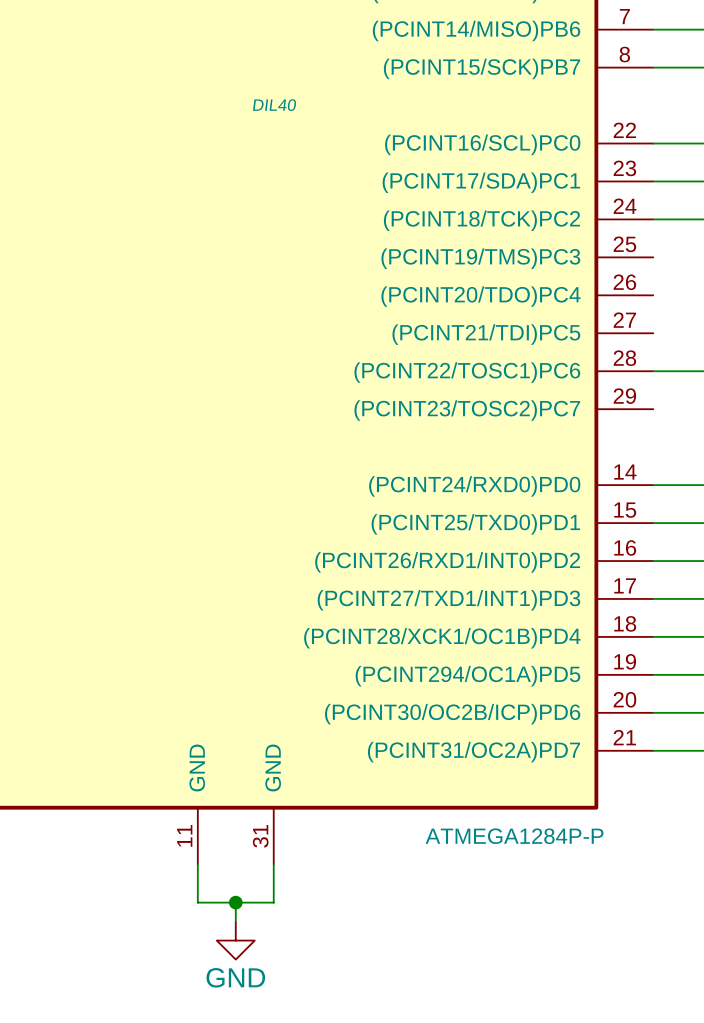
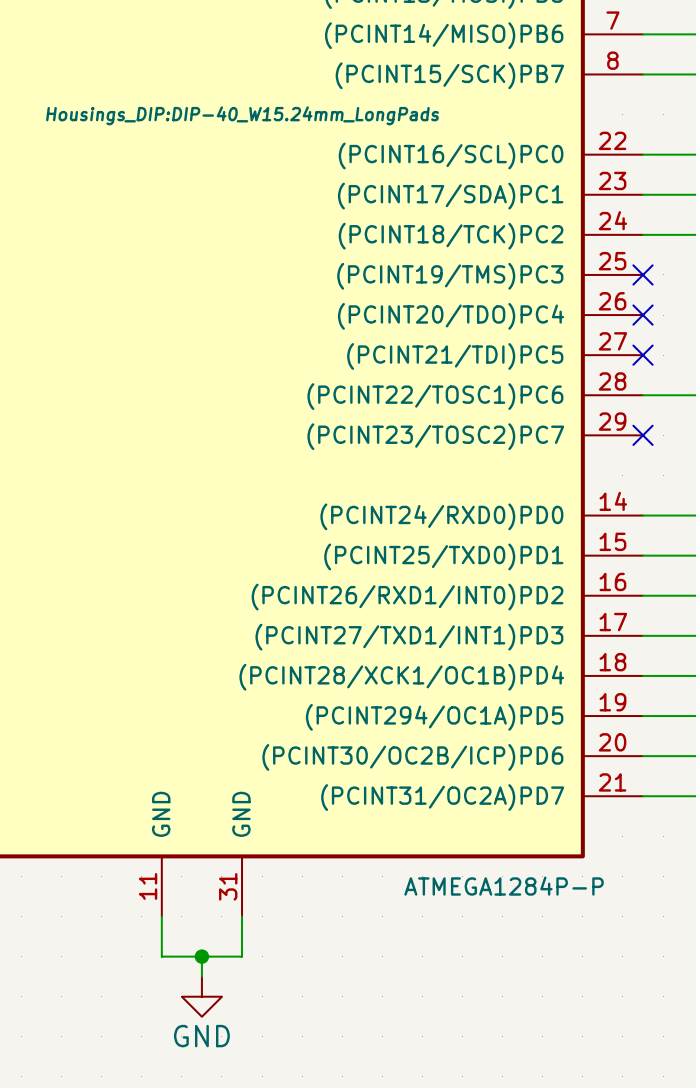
part text: DIL40 (274, 105) -> Housings_DIP:DIP-40_W15.24mm_LongPads (242, 115)
no-connect mark: none -> (643, 274)
no-connect mark: none -> (643, 315)
no-connect mark: none -> (643, 355)
no-connect mark: none -> (643, 435)

